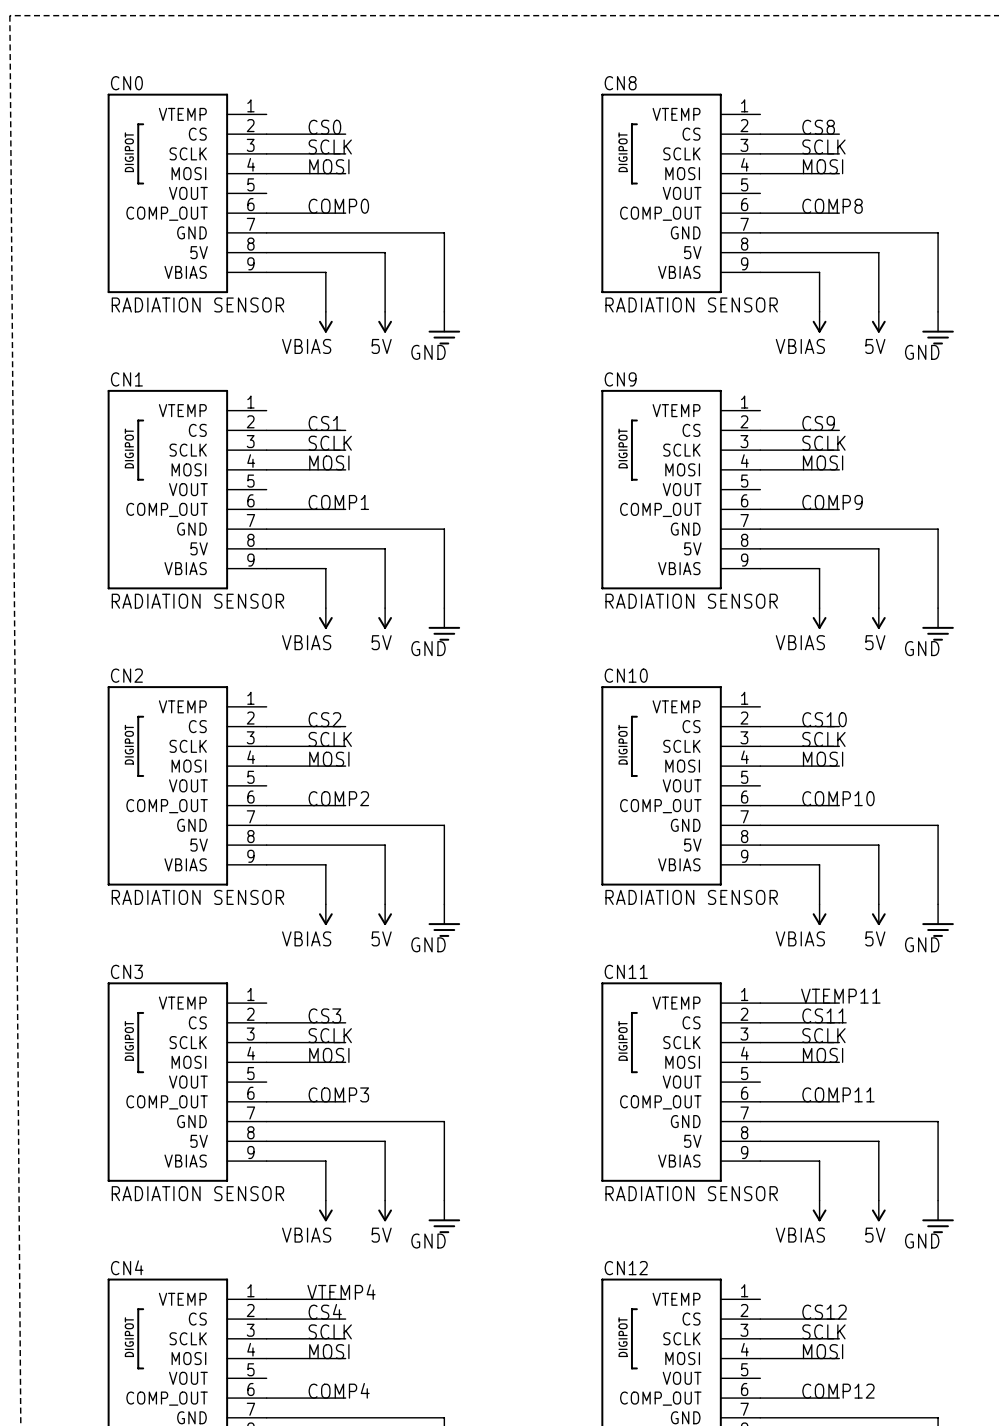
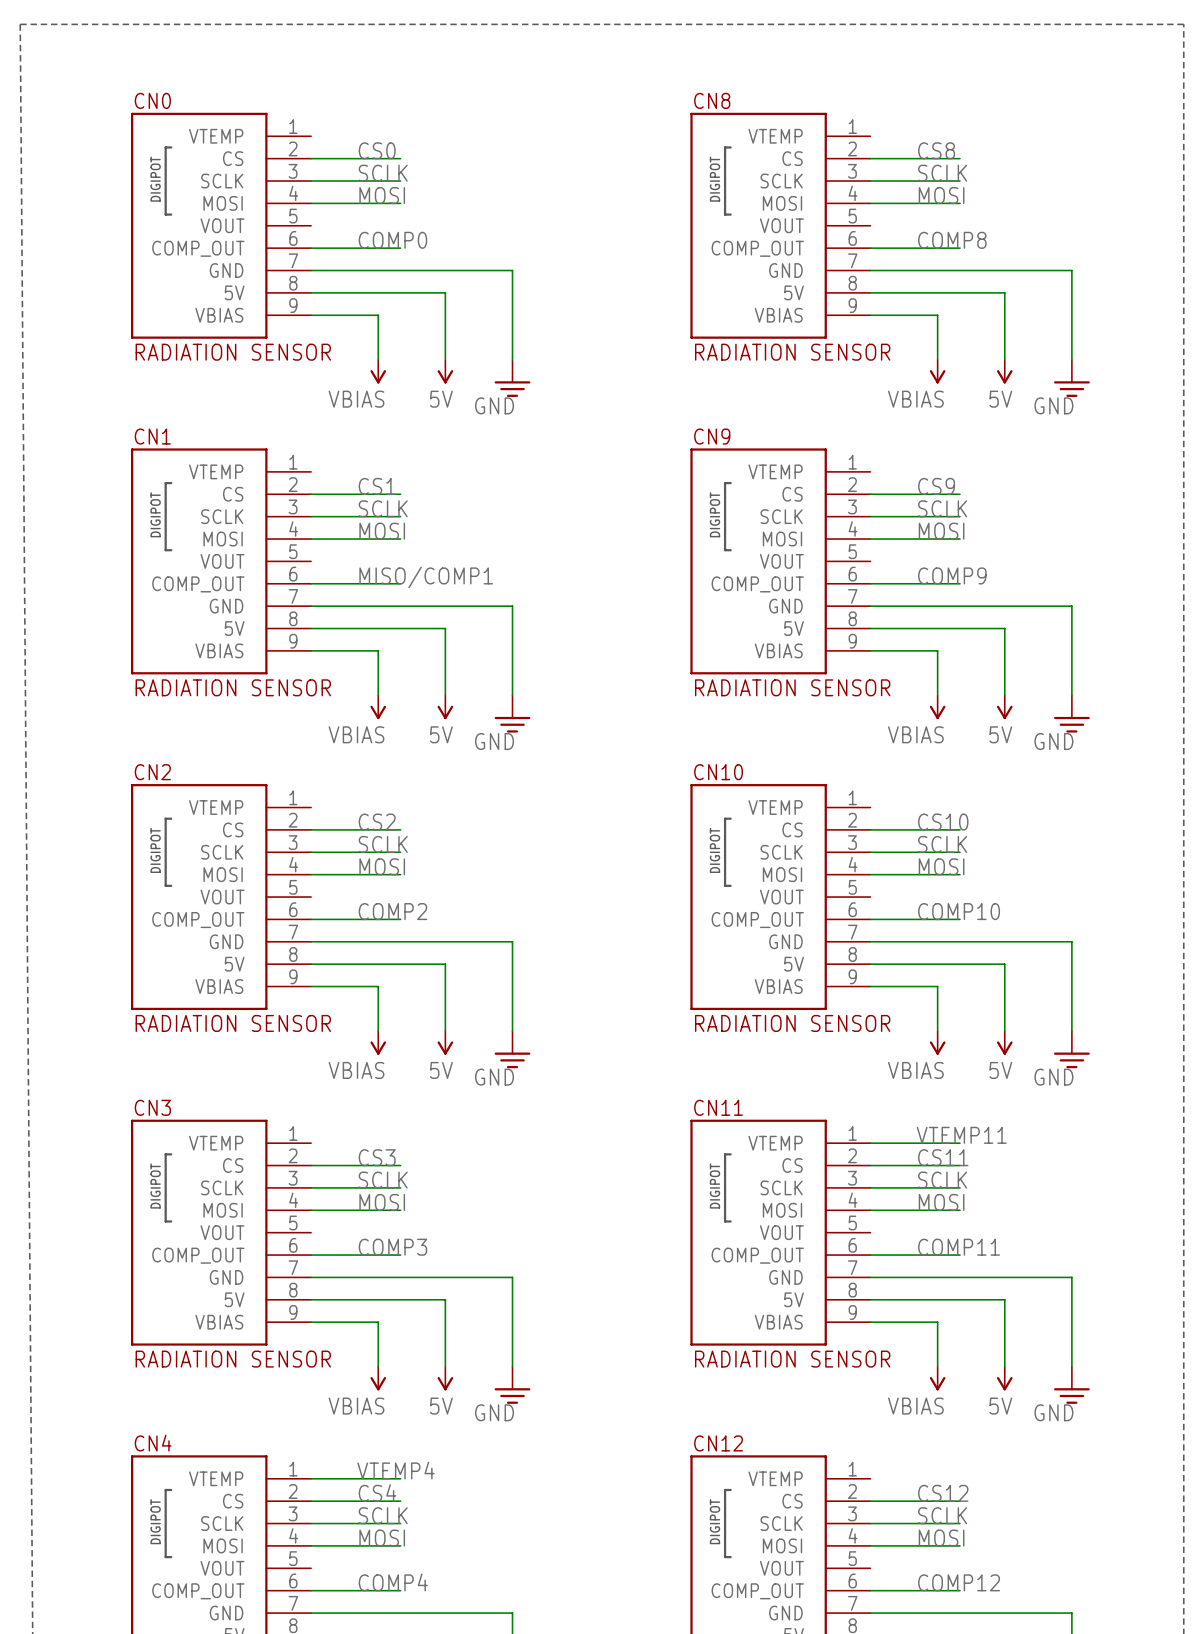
label: COMP1 (338, 502) -> MISO/COMP1 (426, 577)

